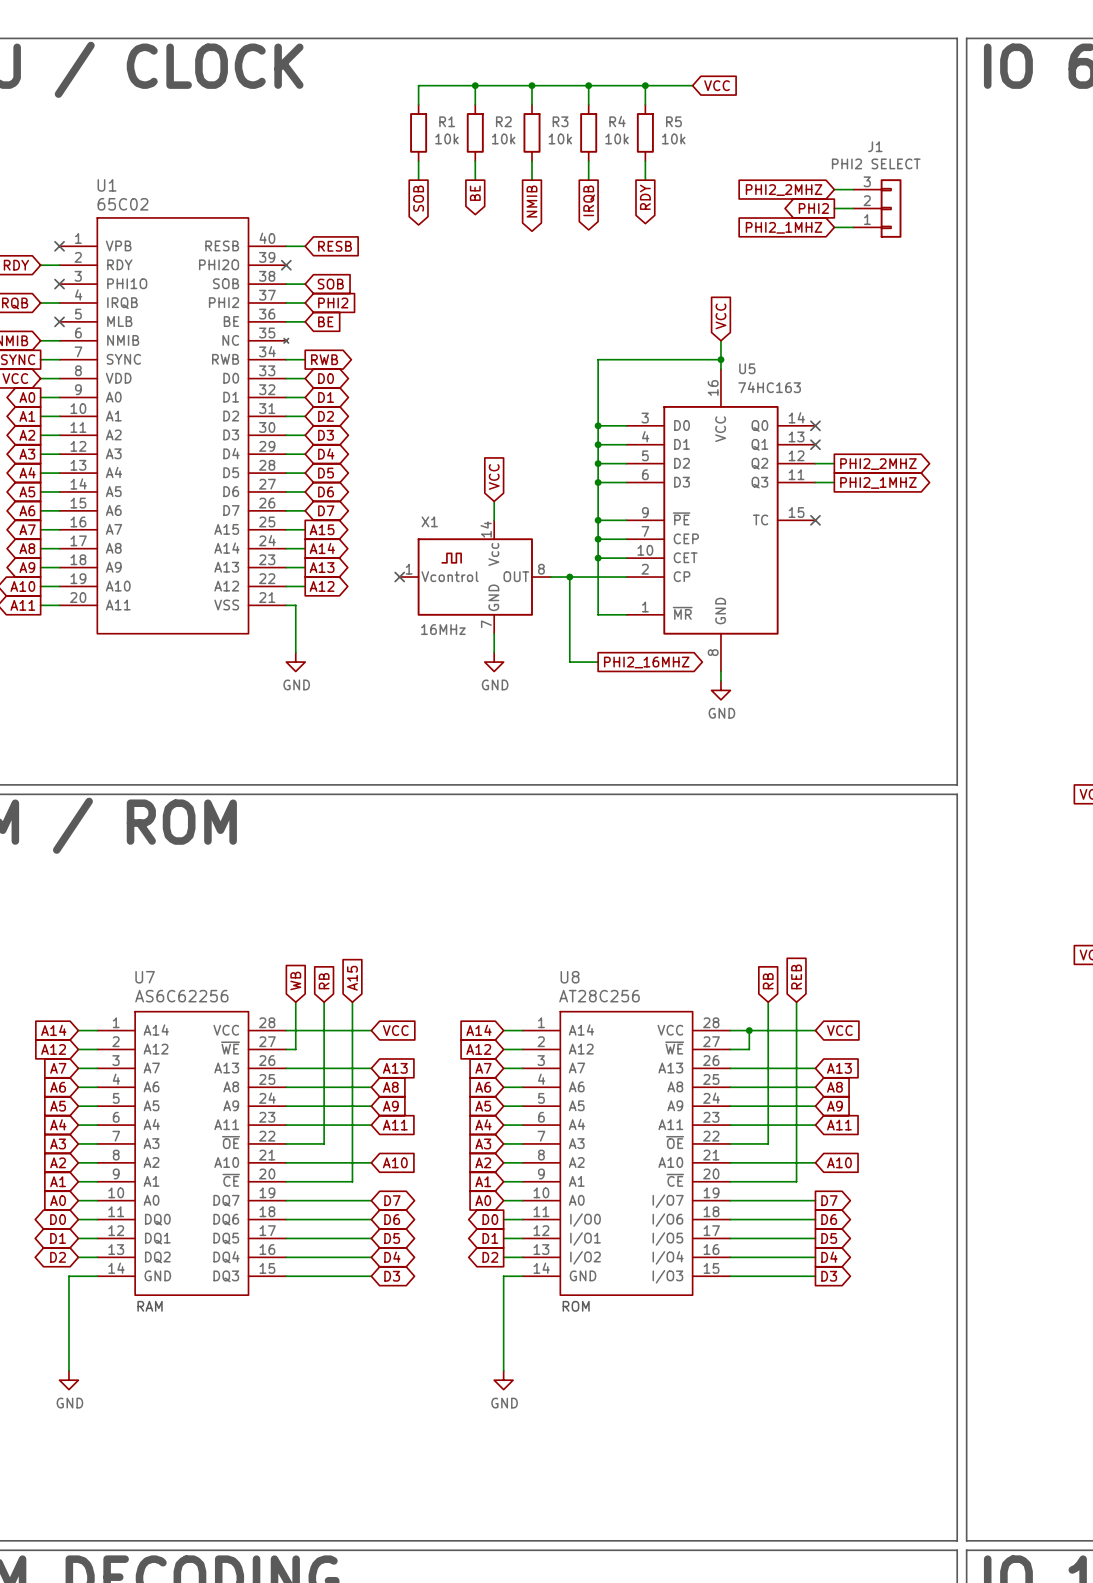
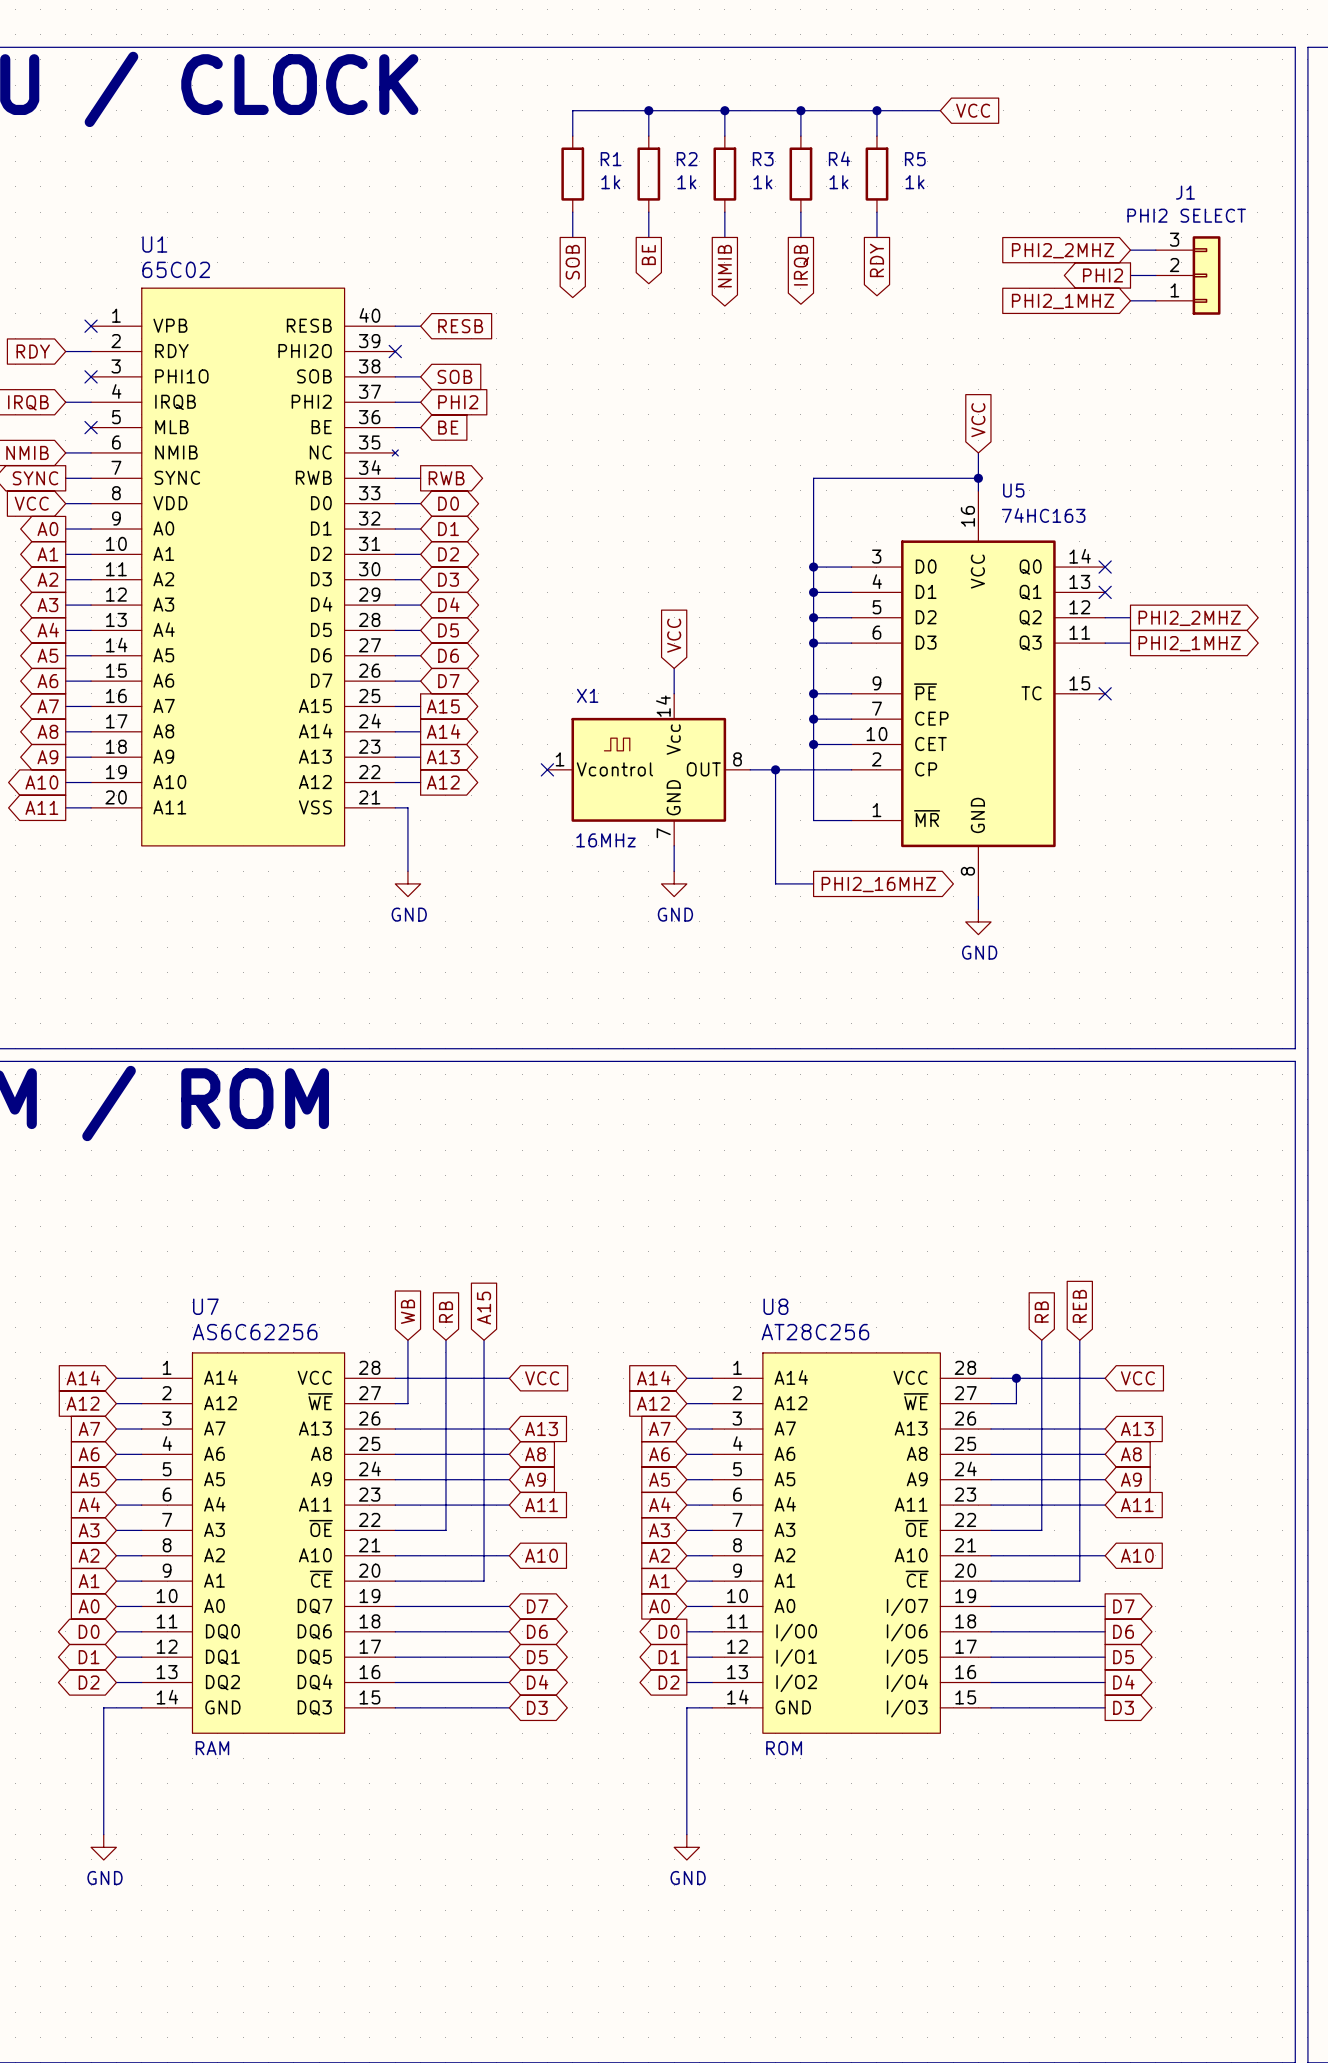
R1 value: 10k (446, 138) -> 1k (610, 182)
R2 value: 10k (503, 138) -> 1k (686, 182)
R3 value: 10k (560, 138) -> 1k (762, 182)
R4 value: 10k (617, 138) -> 1k (838, 182)
R5 value: 10k (673, 138) -> 1k (915, 182)

